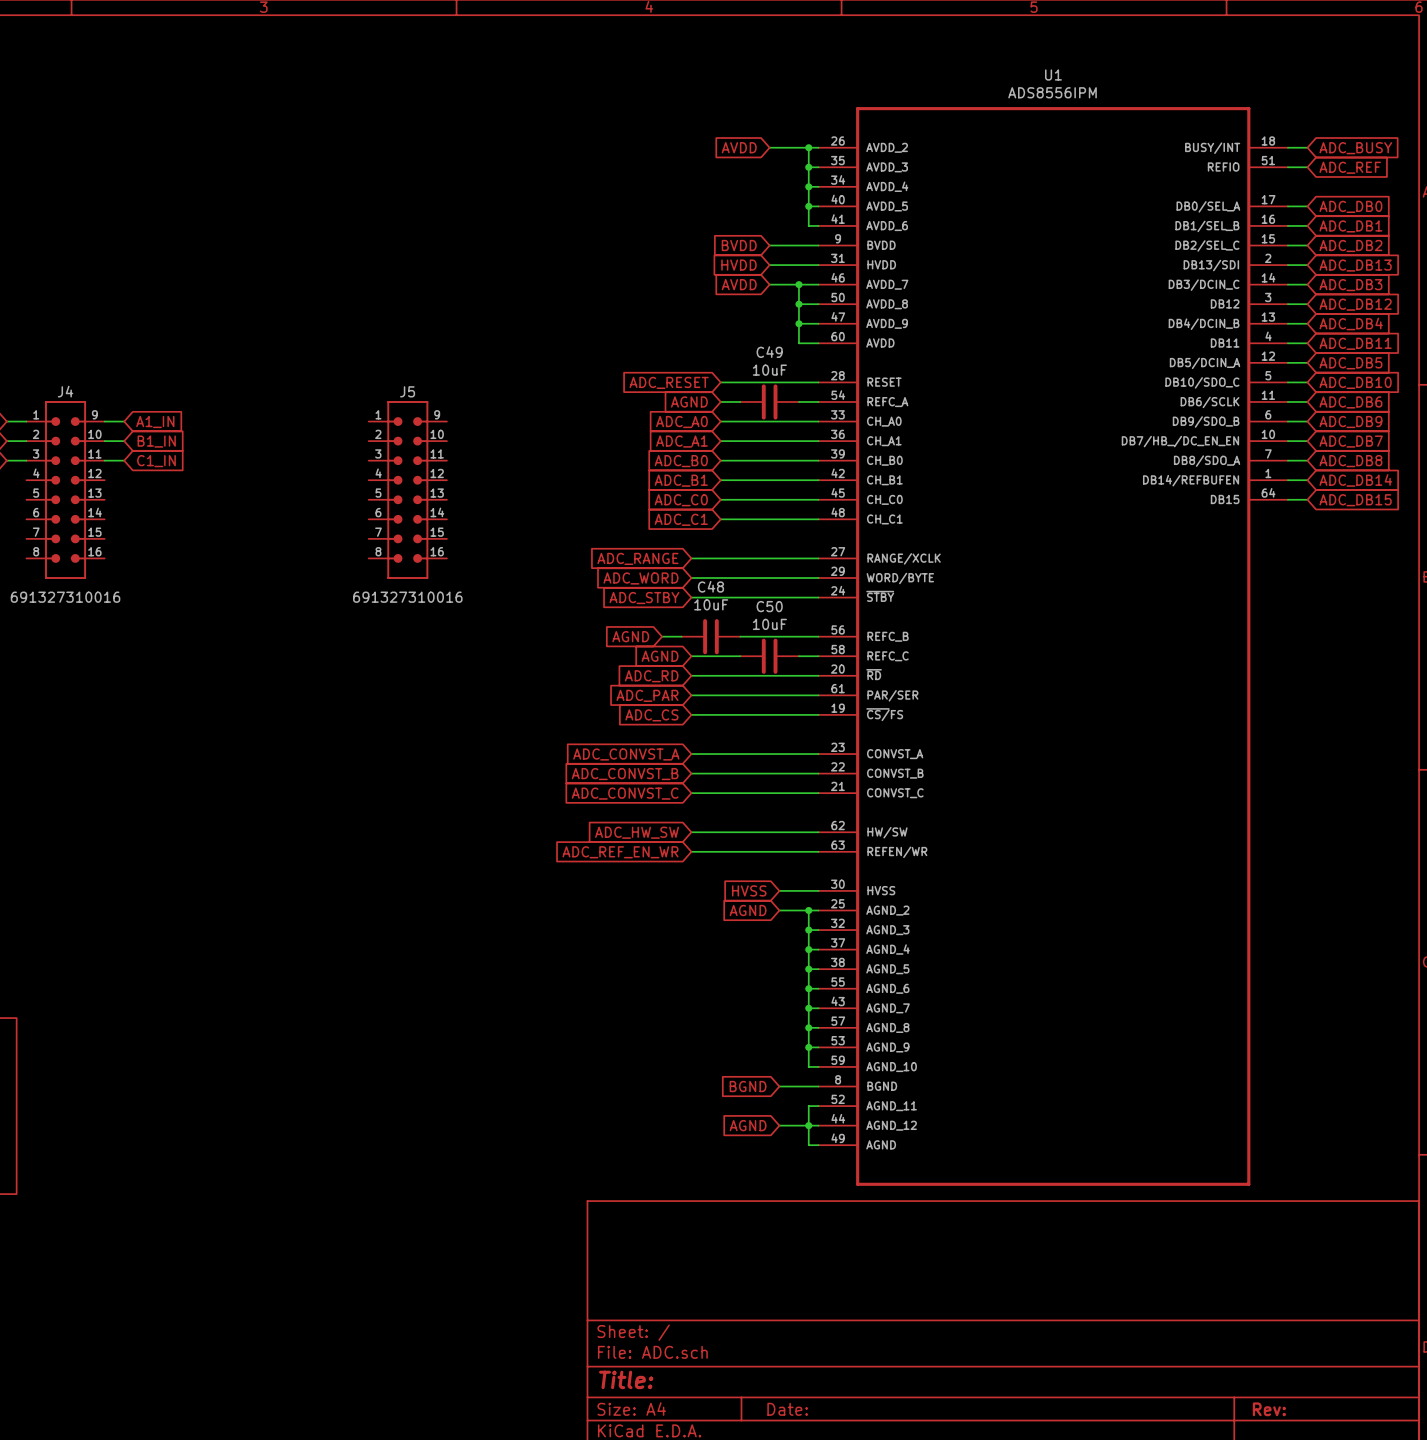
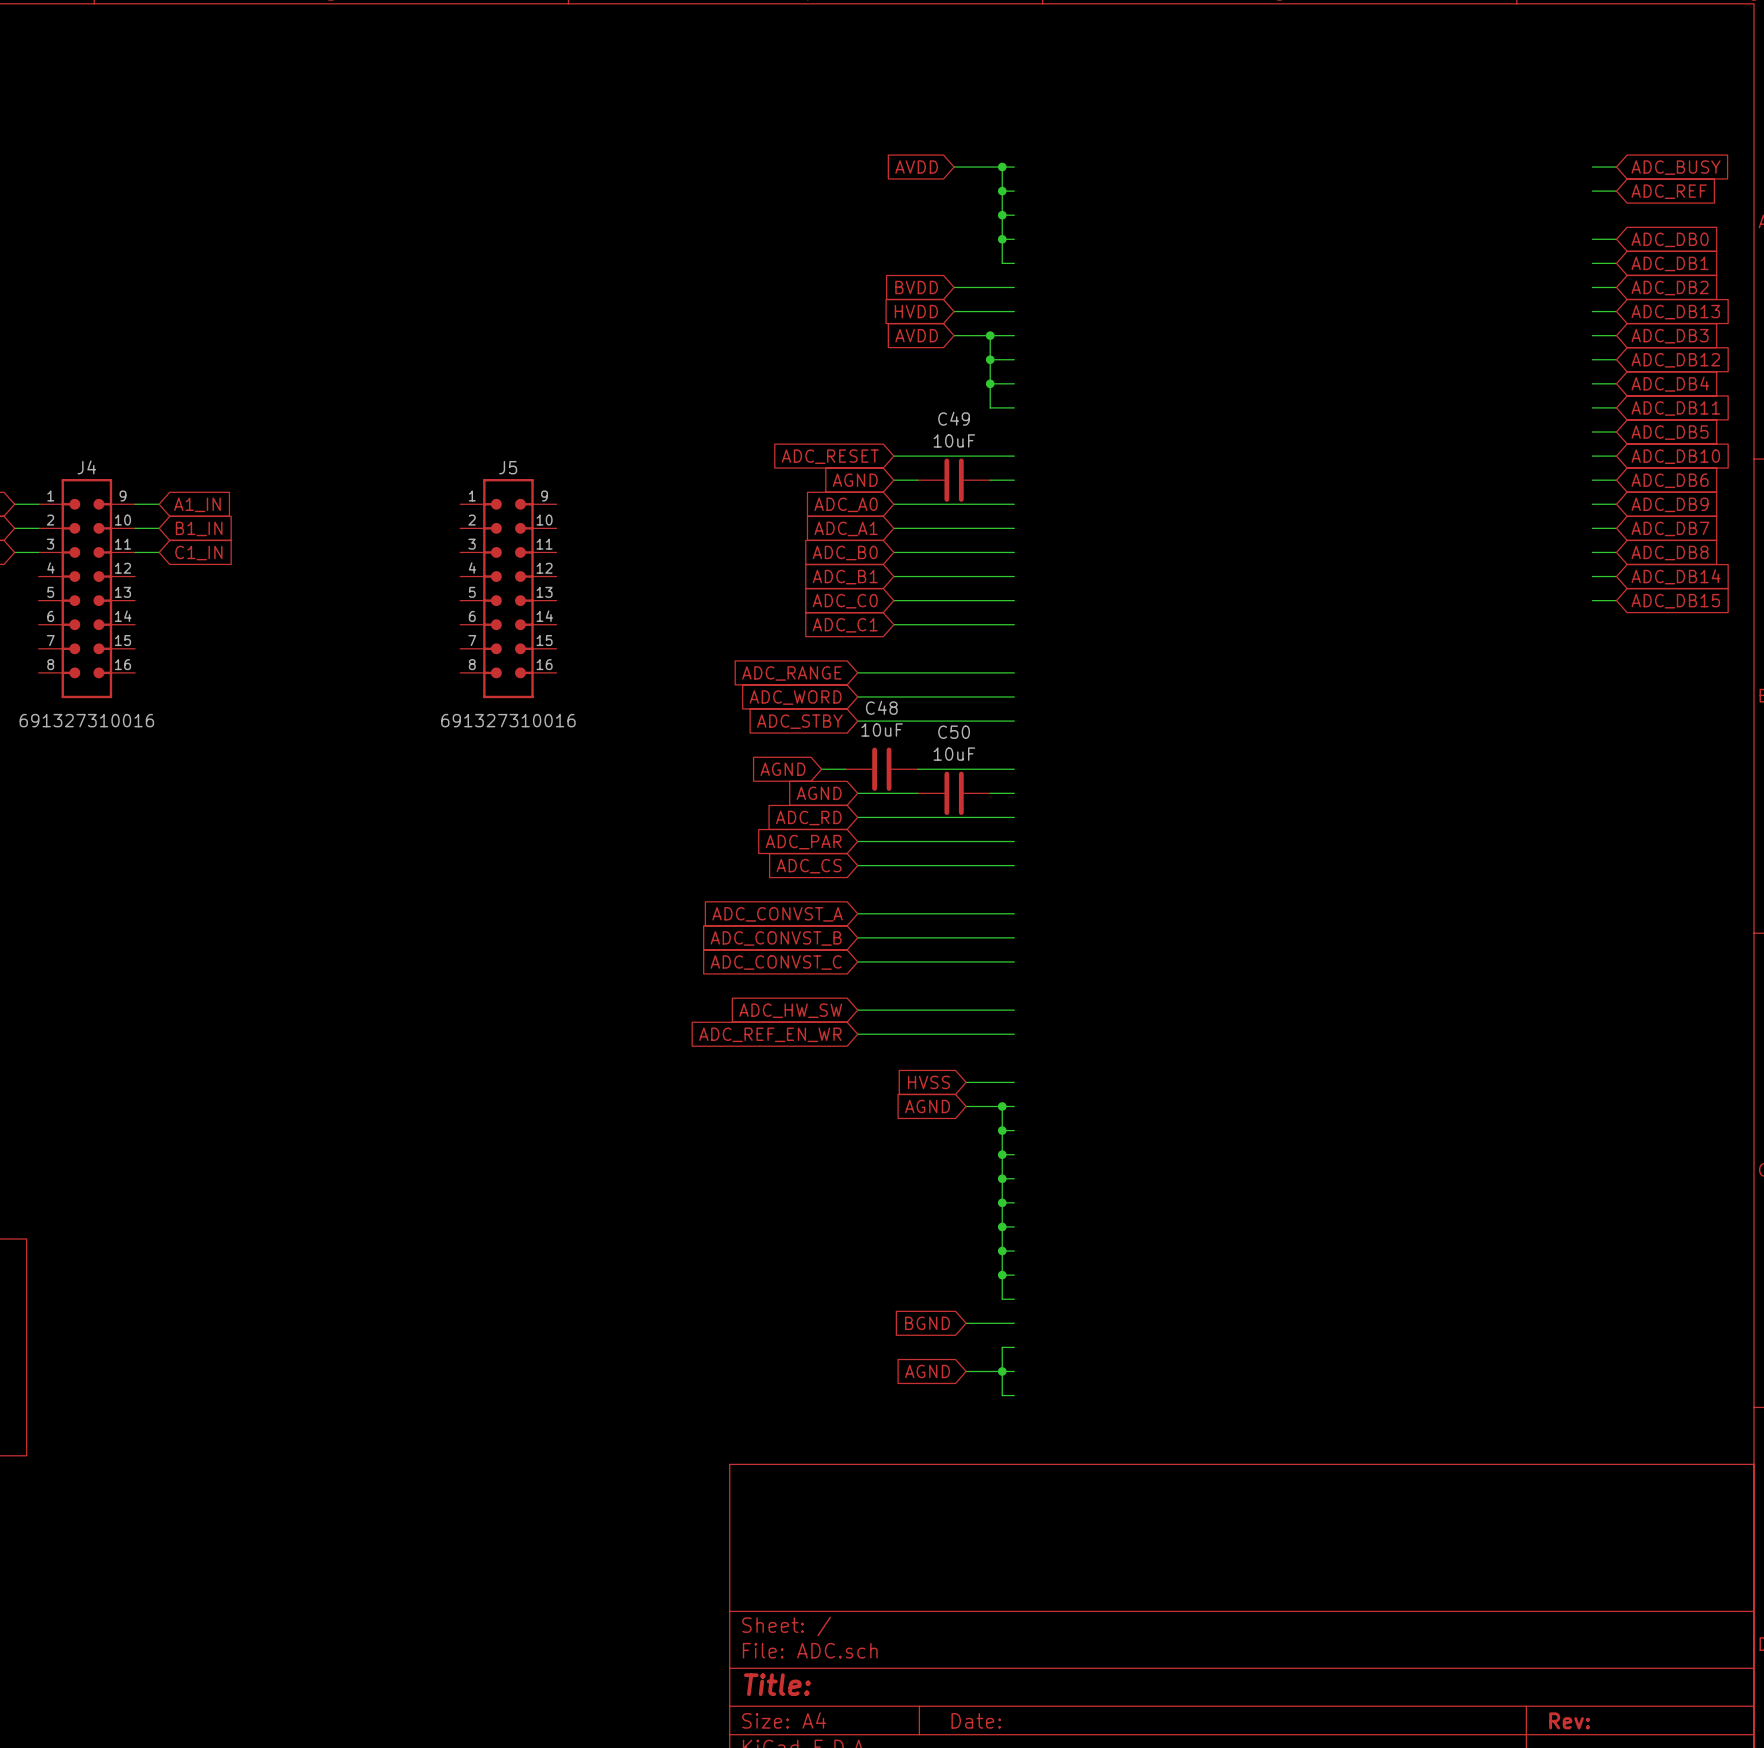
U1: ADS8556IPM (1053, 646) -> none

